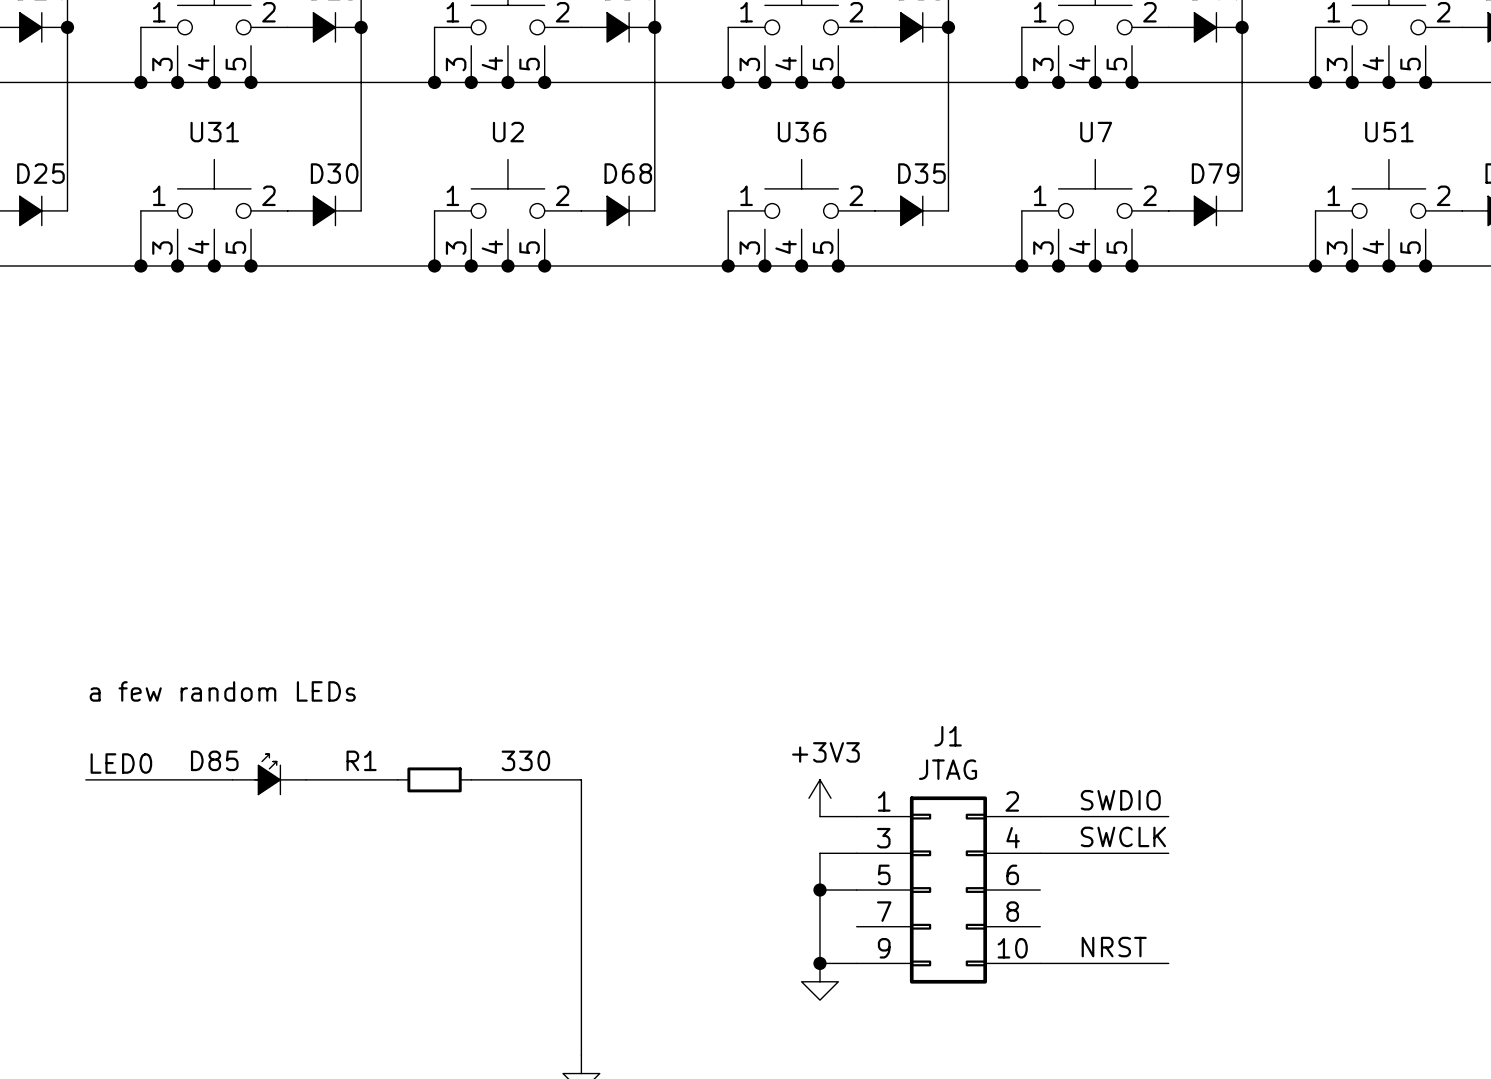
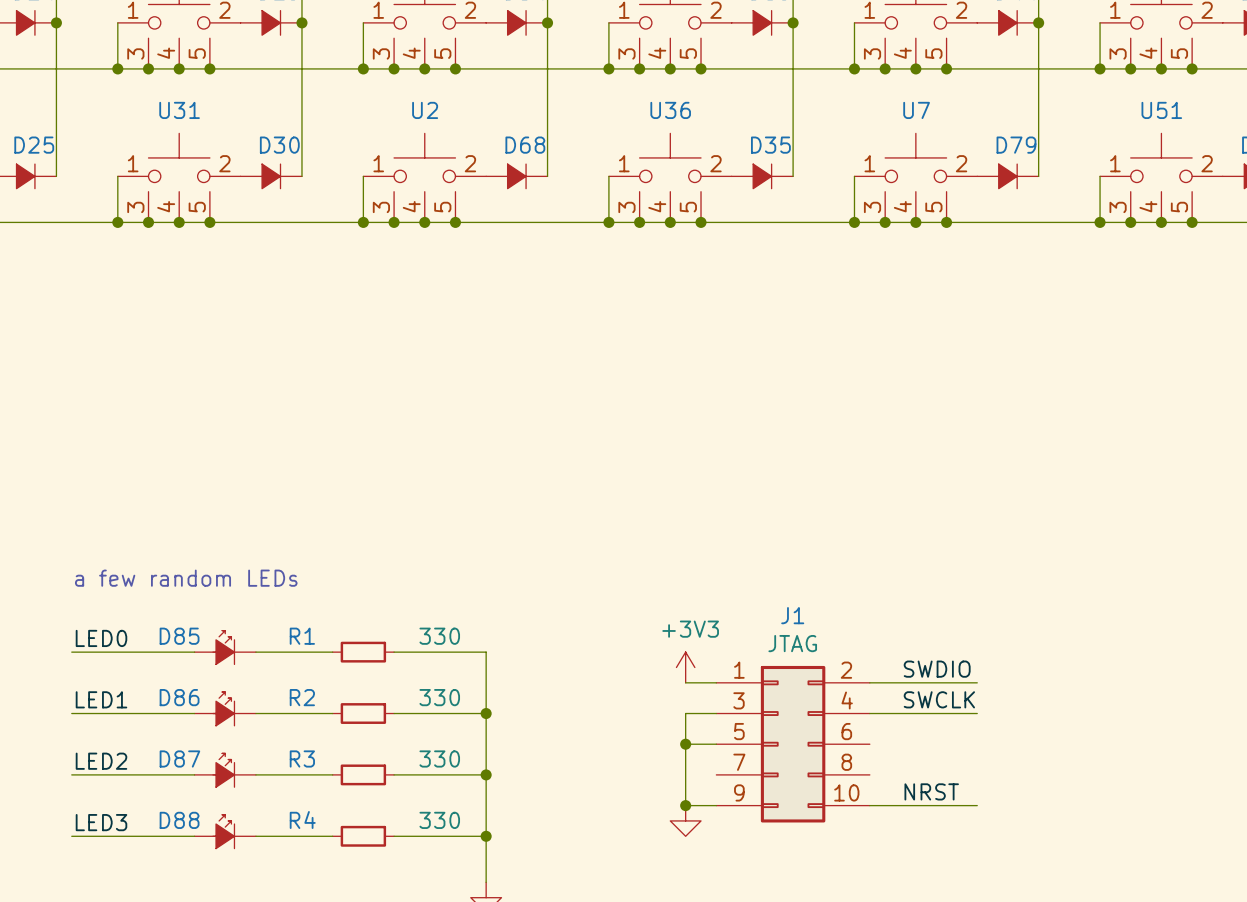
label: none -> LED1 (101, 699)
D86: none -> (225, 708)
wire: none -> (71, 713) (194, 713)
wire: none -> (255, 713) (332, 713)
R2: none -> 330 (363, 713)
wire: none -> (394, 713) (486, 713)
junction: none -> (486, 713)
label: none -> LED2 (101, 761)
D87: none -> (225, 770)
wire: none -> (71, 774) (194, 774)
wire: none -> (255, 774) (332, 774)
R3: none -> 330 (363, 774)
wire: none -> (394, 774) (486, 774)
junction: none -> (486, 774)
label: none -> LED3 (101, 822)
D88: none -> (225, 831)
wire: none -> (71, 836) (194, 836)
wire: none -> (255, 836) (332, 836)
R4: none -> 330 (363, 836)
wire: none -> (394, 836) (486, 836)
junction: none -> (486, 836)

